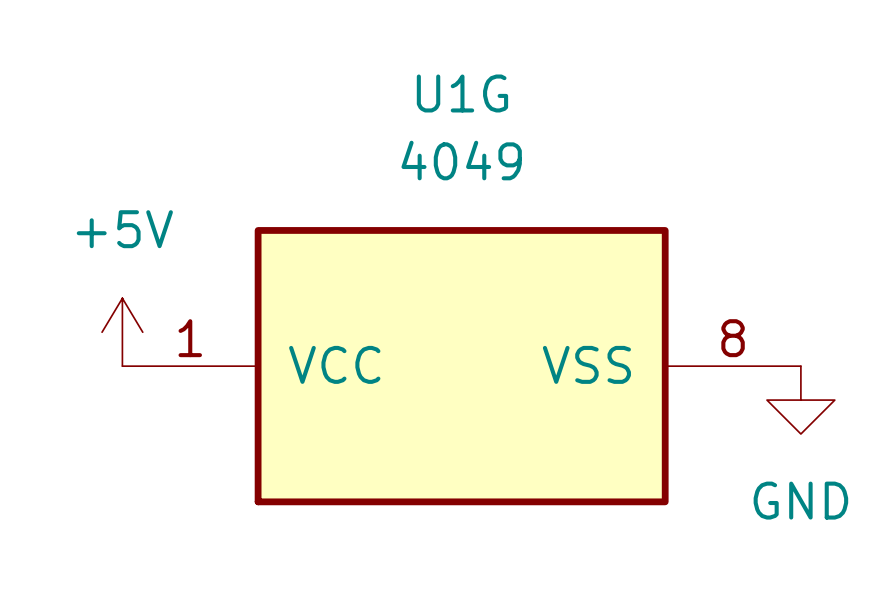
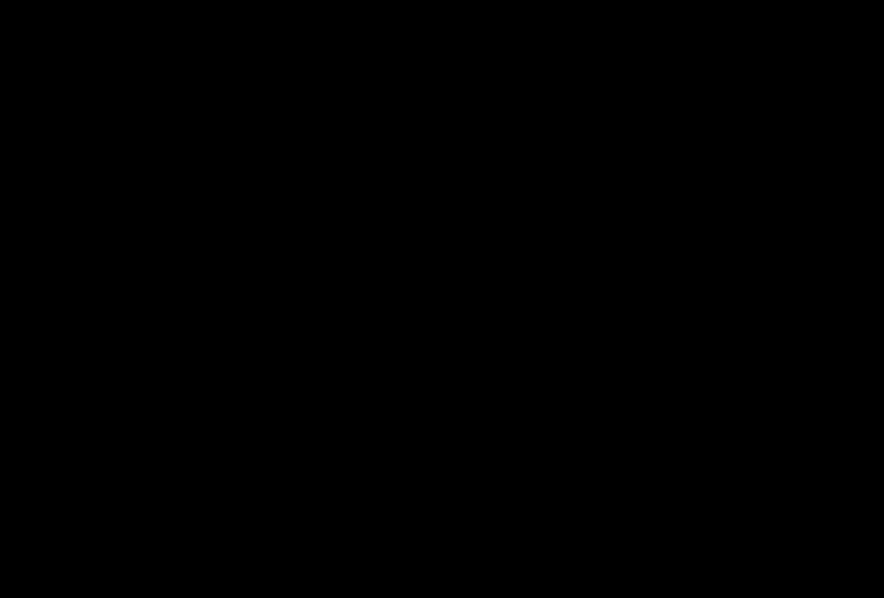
power symbol: +5V (122, 332) -> none
U1G: 4049 (461, 366) -> none
power symbol: GND (800, 400) -> none

